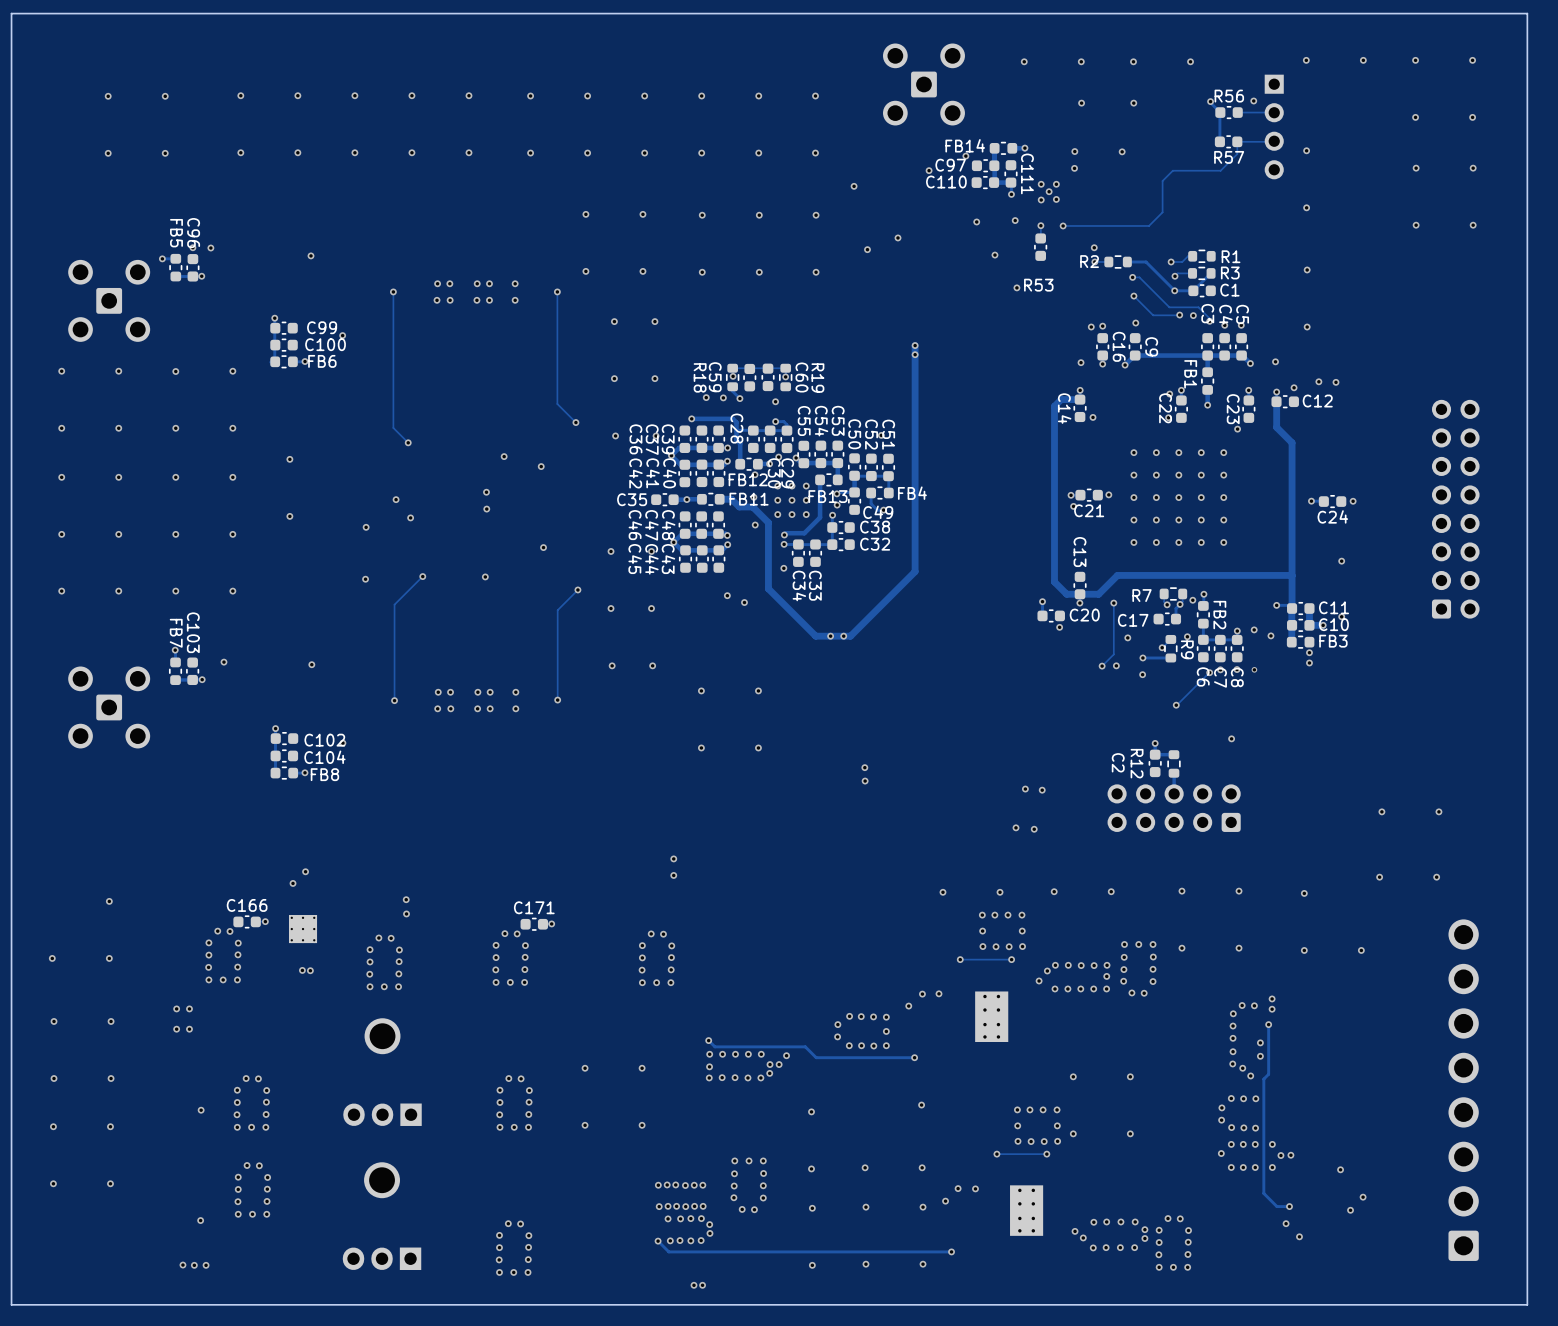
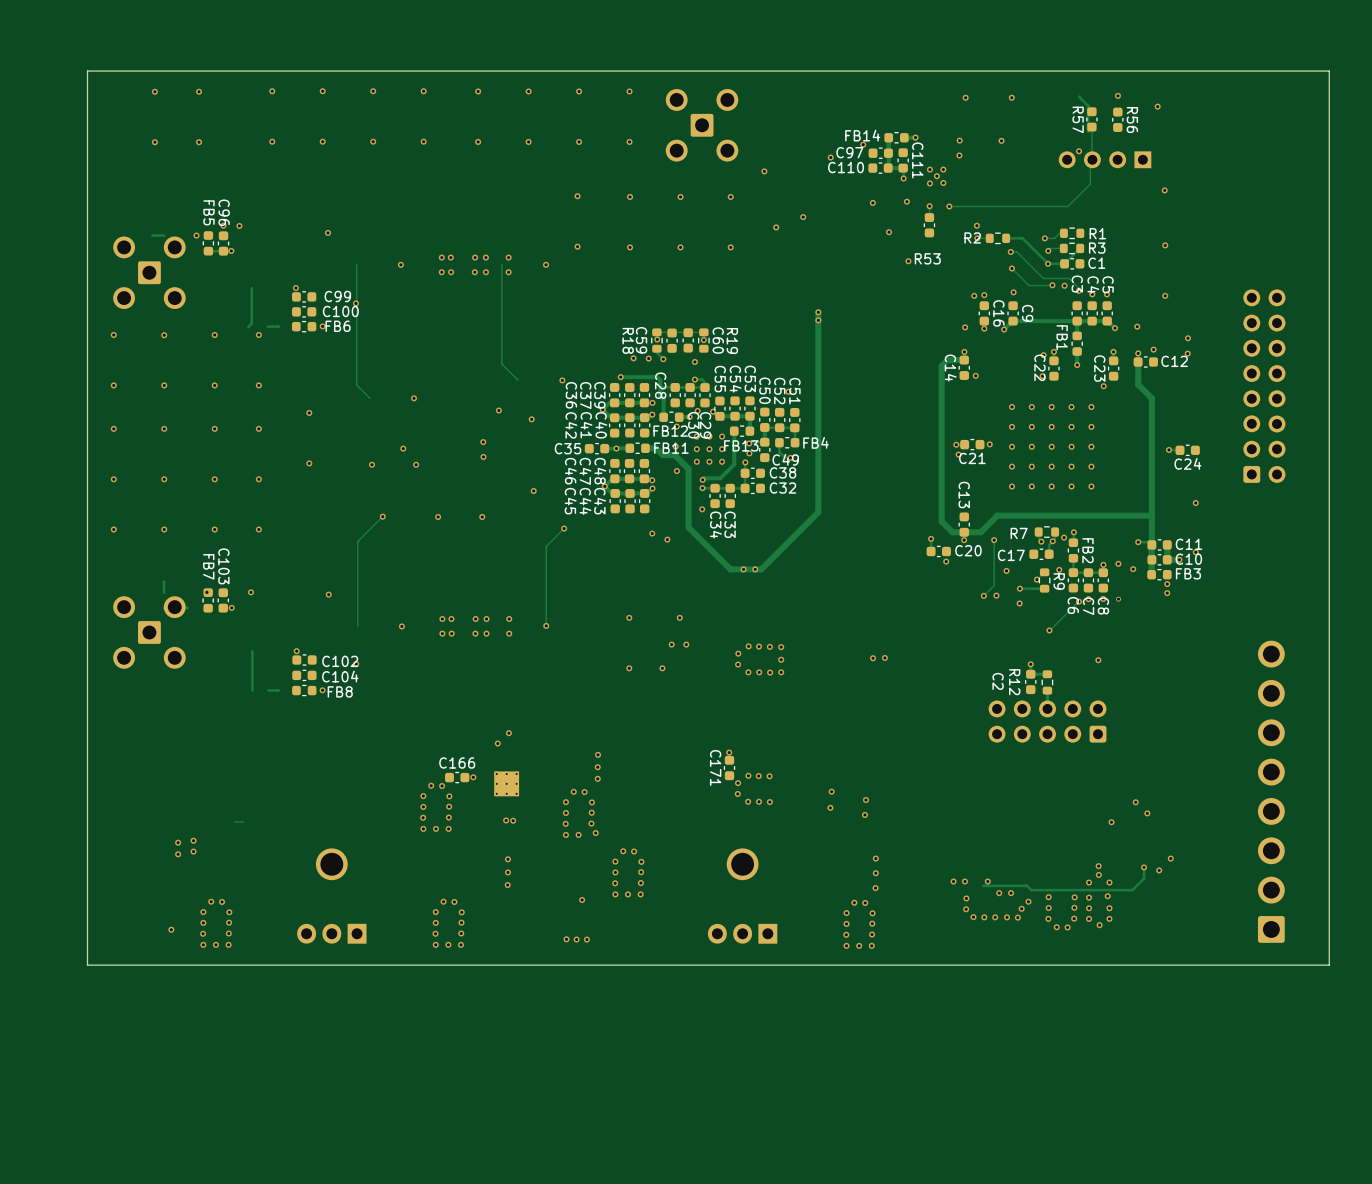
board edge: (1527, 13) (11, 13) (11, 1304) (1527, 1304) (1527, 13) -> (1329, 71) (1329, 965) (87, 965) (87, 71) (1329, 71)
via: (1306, 60) -> none
via: (1363, 60) -> none
via: (1415, 60) -> none
via: (1472, 60) -> none
via: (1024, 61) -> none
via: (1081, 61) -> none
via: (1133, 61) -> none
via: (1190, 61) -> none
part position: (923, 84) -> (702, 125)
via position: (240, 95) -> (199, 91)
via: (108, 96) -> none
via: (758, 96) -> none
via: (815, 96) -> none
via: (1210, 101) -> none
R56 rotation: 0° (1229, 112) -> 90° clockwise (1117, 119)
R56 position: (1229, 112) -> (1117, 119)
track: (1237, 112) (1274, 112) -> none
via: none -> (1157, 106)
via: (1415, 117) -> none
via: (1472, 117) -> none
part rotation: 0° (1274, 126) -> 90° clockwise (1105, 159)
R57 rotation: 0° (1228, 141) -> 90° clockwise (1091, 119)
track: (1274, 141) (1237, 141) (1237, 154) (1220, 170) (1172, 170) (1162, 180) (1162, 212) (1148, 225) -> (1091, 127) (1090, 184) (1067, 206) (1025, 206)
via: (1306, 150) -> none
via position: (240, 152) -> (199, 142)
via: (108, 153) -> none
via: (758, 153) -> none
via: (815, 153) -> none
via: none -> (1079, 151)
via: (1416, 168) -> none
via: (1473, 168) -> none
via: (585, 214) -> none
via: (1416, 225) -> none
via: (1473, 225) -> none
via: (192, 247) -> none
via: none -> (223, 225)
via: (210, 248) -> none
via: none -> (239, 225)
via: (310, 255) -> none
via: none -> (327, 232)
via: (162, 258) -> none
via: none -> (196, 235)
FB5 position: (175, 267) -> (208, 243)
C96 position: (192, 267) -> (223, 243)
via: (585, 271) -> none
via: (201, 276) -> none
via: none -> (231, 250)
via: (437, 283) -> none
via: (449, 283) -> none
via: (477, 283) -> none
via: none -> (450, 257)
via: (515, 283) -> none
via: none -> (475, 257)
via: none -> (485, 257)
via: none -> (508, 257)
via: (393, 291) -> none
via: none -> (400, 264)
via: (557, 291) -> none
via: none -> (545, 264)
part position: (109, 300) -> (149, 272)
via: (437, 300) -> none
via: (450, 300) -> none
via: (476, 300) -> none
via: none -> (451, 272)
via: (515, 300) -> none
via: none -> (474, 272)
via: none -> (485, 272)
via: none -> (508, 272)
via: (274, 318) -> none
via: none -> (295, 288)
via: (614, 321) -> none
via: (654, 321) -> none
C99 position: (284, 328) -> (304, 296)
via: (342, 335) -> none
via: none -> (356, 303)
C100 position: (284, 345) -> (304, 311)
FB6 position: (284, 361) -> (304, 326)
via: (305, 361) -> none
via: none -> (322, 326)
via: (61, 371) -> none
via: none -> (258, 334)
via: none -> (1187, 338)
via: (614, 378) -> none
via: (654, 378) -> none
via: (1318, 381) -> none
via: (1335, 382) -> none
via: none -> (1187, 353)
via: (575, 422) -> none
via: none -> (562, 380)
via: (61, 428) -> none
via: none -> (258, 385)
via: (615, 435) -> none
via: (656, 435) -> none
via: (408, 442) -> none
via: none -> (414, 398)
via: (504, 456) -> none
via: none -> (498, 410)
via: (289, 459) -> none
via: none -> (309, 412)
via: (541, 466) -> none
via: none -> (531, 419)
via: (61, 477) -> none
via: none -> (258, 428)
via: (486, 492) -> none
via: none -> (483, 442)
via: (396, 499) -> none
via: none -> (403, 448)
via: (1353, 501) -> none
via: (486, 509) -> none
via: none -> (483, 456)
part position: (1455, 509) -> (1264, 386)
via position: (289, 516) -> (258, 479)
via: none -> (309, 463)
via: none -> (416, 464)
via: (366, 527) -> none
via: (61, 534) -> none
via: (543, 547) -> none
via position: (611, 551) -> (533, 491)
via: (651, 551) -> none
via: none -> (482, 517)
via: (365, 579) -> none
track: (577, 589) (557, 610) (557, 700) -> (564, 528) (546, 546) (546, 625)
via: (577, 589) -> none
via: none -> (564, 528)
via: (61, 591) -> none
via: none -> (258, 529)
via: (611, 608) -> none
via: (651, 608) -> none
via: (175, 650) -> none
via: none -> (251, 592)
via: (311, 664) -> none
via: none -> (328, 594)
via: (612, 665) -> none
via: (652, 665) -> none
FB7 position: (175, 671) -> (208, 600)
C103 position: (192, 671) -> (223, 600)
via: (202, 679) -> none
via: none -> (231, 607)
via: (438, 692) -> none
via: (450, 692) -> none
via: (477, 692) -> none
via: none -> (451, 619)
via: (515, 692) -> none
via: none -> (475, 619)
via: none -> (486, 619)
via: none -> (509, 619)
via: (394, 700) -> none
via: none -> (401, 626)
via: (557, 700) -> none
via: none -> (546, 625)
part position: (109, 707) -> (149, 632)
via: (437, 708) -> none
via: (450, 708) -> none
via: (477, 708) -> none
via: none -> (451, 633)
via: (515, 708) -> none
via: none -> (475, 633)
via: none -> (486, 633)
via: none -> (509, 633)
via: none -> (671, 644)
via: none -> (686, 644)
via: none -> (748, 646)
via: none -> (758, 646)
via: none -> (769, 646)
via: none -> (781, 647)
via: (275, 728) -> none
via: none -> (296, 651)
via: none -> (738, 653)
via: none -> (873, 658)
via: none -> (884, 657)
C102 position: (284, 738) -> (304, 659)
via: none -> (781, 659)
via: (342, 743) -> none
via: none -> (356, 664)
via: none -> (738, 664)
via: none -> (662, 668)
via: (758, 747) -> none
via: none -> (748, 672)
via: none -> (759, 672)
via: none -> (770, 672)
via: none -> (781, 672)
C104 position: (284, 755) -> (304, 675)
via: (864, 767) -> none
via: (304, 772) -> none
via: none -> (322, 690)
FB8 position: (284, 773) -> (304, 690)
via: (865, 781) -> none
via: (1025, 789) -> none
via: (1042, 790) -> none
via: (1381, 811) -> none
via: (1438, 811) -> none
via: none -> (508, 733)
via: (1015, 827) -> none
via: (1034, 829) -> none
via: none -> (497, 743)
via: none -> (729, 752)
via: none -> (598, 754)
via: (673, 858) -> none
via: none -> (597, 767)
via: none -> (748, 775)
via: none -> (758, 776)
via: none -> (769, 776)
via: (305, 871) -> none
via: none -> (473, 777)
via: none -> (597, 778)
via: (673, 875) -> none
via: none -> (738, 783)
via: (1379, 877) -> none
via: (1436, 877) -> none
via: none -> (431, 785)
via: none -> (442, 786)
via: (293, 883) -> none
via: none -> (573, 791)
via: none -> (584, 792)
via: none -> (831, 791)
via: none -> (737, 793)
via: (1054, 891) -> none
via: (1111, 891) -> none
via: (1181, 891) -> none
via: (1239, 891) -> none
via: none -> (423, 796)
via: none -> (449, 796)
via: (942, 892) -> none
via: (1000, 892) -> none
via: (1304, 893) -> none
via: none -> (865, 800)
via: none -> (748, 801)
via: none -> (758, 801)
via: (406, 899) -> none
via: none -> (565, 802)
via: none -> (591, 802)
via: none -> (769, 802)
via: none -> (1135, 802)
via: (109, 901) -> none
via: none -> (423, 806)
via: none -> (449, 806)
via: none -> (830, 807)
C171 name position: C171 (534, 907) -> C171 (715, 767)
via: none -> (565, 813)
via: none -> (591, 812)
via: none -> (1147, 813)
via: (406, 913) -> none
via: none -> (864, 814)
via: (982, 915) -> none
via: (994, 915) -> none
via: (1008, 915) -> none
via: (1021, 915) -> none
via: none -> (423, 817)
via: none -> (448, 817)
via: none -> (506, 820)
via: none -> (513, 820)
C166 position: (247, 921) -> (457, 777)
via: (265, 921) -> none
via: none -> (1111, 822)
via: (551, 923) -> none
via: none -> (565, 823)
via: none -> (591, 823)
C171 rotation: 0° (534, 924) -> 90° clockwise (729, 767)
C171 position: (534, 924) -> (729, 767)
part position: (303, 929) -> (506, 783)
via: none -> (423, 828)
via: none -> (436, 828)
via: none -> (448, 828)
via: (217, 931) -> none
via: (230, 931) -> none
via: (982, 931) -> none
via: (1022, 931) -> none
via: (504, 933) -> none
via: (517, 933) -> none
via: (651, 933) -> none
via: none -> (565, 834)
via: none -> (578, 834)
via: (378, 938) -> none
via: (391, 938) -> none
via: (238, 943) -> none
via: (1124, 944) -> none
via: (1138, 944) -> none
via: (1153, 944) -> none
via: none -> (178, 842)
via: (496, 945) -> none
via: (525, 945) -> none
via: (642, 945) -> none
via: (671, 945) -> none
via: (982, 946) -> none
via: (996, 946) -> none
via: (1009, 946) -> none
via: (1022, 946) -> none
via: (1181, 948) -> none
via: (1239, 948) -> none
via: (370, 949) -> none
via: (399, 949) -> none
via: (1304, 950) -> none
via: (1361, 950) -> none
via: (237, 954) -> none
via: none -> (623, 851)
via: none -> (634, 851)
via: (496, 957) -> none
via: (525, 957) -> none
via: (642, 957) -> none
via: (671, 957) -> none
via: (1124, 957) -> none
via: (1153, 957) -> none
via: (52, 958) -> none
via: (109, 958) -> none
via: none -> (178, 854)
via: (960, 959) -> none
track: (1011, 959) (960, 959) -> none
via: (1011, 959) -> none
via: (370, 961) -> none
via: (399, 961) -> none
via: none -> (507, 859)
via: none -> (875, 858)
via: none -> (1170, 858)
via: (1055, 965) -> none
via: (1068, 965) -> none
via: (1081, 965) -> none
via: (1094, 965) -> none
via: (1107, 965) -> none
via: none -> (615, 861)
via: none -> (641, 861)
via: (208, 967) -> none
via: (237, 967) -> none
via: (495, 969) -> none
via: (524, 969) -> none
via: (671, 969) -> none
part: none -> (742, 864)
via: (1123, 969) -> none
via: (1153, 969) -> none
via: (302, 970) -> none
via: (310, 970) -> none
via: (642, 970) -> none
via: (1047, 971) -> none
via: none -> (1098, 866)
via: (398, 973) -> none
track: none -> (1144, 867) (1144, 878) (1132, 890) (1031, 890) (1026, 885) (983, 885)
via: none -> (1144, 867)
via: (369, 974) -> none
via: (1106, 976) -> none
via: none -> (1159, 870)
via: none -> (507, 872)
via: none -> (615, 872)
via: none -> (641, 872)
via: (208, 979) -> none
via: (223, 979) -> none
via: (237, 979) -> none
via: none -> (875, 873)
via: (1039, 980) -> none
via: (1123, 981) -> none
via: (1153, 981) -> none
via: none -> (1098, 874)
via: (496, 982) -> none
via: (510, 982) -> none
via: (524, 982) -> none
via: (642, 982) -> none
via: (656, 982) -> none
via: (670, 982) -> none
via: (370, 986) -> none
via: (384, 986) -> none
via: (398, 986) -> none
via: (1054, 988) -> none
via: (1093, 988) -> none
via: none -> (615, 883)
via: none -> (640, 883)
via: none -> (1089, 882)
via: none -> (1109, 882)
via: none -> (507, 885)
via: (1131, 992) -> none
via: (938, 993) -> none
via: (1144, 993) -> none
via: (922, 994) -> none
via: none -> (875, 888)
via: (1272, 998) -> none
via: none -> (999, 893)
via: none -> (1011, 893)
via: none -> (615, 894)
via: none -> (628, 894)
via: none -> (640, 894)
via: (1254, 1005) -> none
via: (908, 1006) -> none
via: none -> (1048, 897)
via: none -> (1074, 897)
via: none -> (1089, 897)
via: (176, 1008) -> none
via: (189, 1008) -> none
via: none -> (966, 898)
via: none -> (582, 899)
via: (1272, 1009) -> none
via: none -> (211, 901)
via: none -> (443, 901)
via: none -> (1028, 901)
via: none -> (222, 901)
via: none -> (454, 901)
via: none -> (854, 902)
via: none -> (865, 902)
via: (1233, 1013) -> none
via: (849, 1016) -> none
via: (861, 1016) -> none
via: (873, 1016) -> none
part: (991, 1016) -> none
via: (886, 1017) -> none
via: none -> (1048, 908)
via: none -> (1074, 907)
via: none -> (1021, 908)
via: none -> (1089, 908)
via: none -> (1109, 908)
via: none -> (966, 909)
via: (54, 1021) -> none
via: (111, 1021) -> none
via: none -> (203, 912)
via: none -> (229, 912)
via: none -> (435, 912)
via: none -> (461, 912)
via: (837, 1024) -> none
via: none -> (846, 913)
via: none -> (872, 913)
track: (1268, 1024) (1268, 1074) (1263, 1079) (1263, 1193) (1276, 1206) (1289, 1206) -> none
via: (1268, 1024) -> none
via: (1233, 1026) -> none
via: (176, 1029) -> none
via: (189, 1029) -> none
via: none -> (973, 917)
via: none -> (984, 917)
via: none -> (995, 917)
via: none -> (1007, 917)
via: none -> (1017, 917)
via: none -> (1074, 918)
via: (886, 1031) -> none
via: none -> (1048, 918)
via: none -> (1089, 918)
via: none -> (1109, 918)
via: none -> (203, 922)
via: none -> (229, 922)
via: none -> (435, 922)
via: none -> (461, 922)
part position: (382, 1036) -> (331, 864)
via: (837, 1036) -> none
via: none -> (846, 923)
via: none -> (872, 923)
track: (708, 1040) (714, 1046) (805, 1046) (816, 1057) (914, 1057) -> none
via: (708, 1040) -> none
via: none -> (1056, 927)
via: none -> (1067, 927)
via: (1260, 1042) -> none
via: none -> (171, 929)
via: (849, 1045) -> none
via: (861, 1045) -> none
via: (886, 1045) -> none
via: (873, 1046) -> none
via: none -> (228, 933)
via: none -> (461, 933)
via: none -> (203, 933)
via: none -> (435, 933)
part: none -> (742, 933)
via: none -> (872, 934)
via: none -> (846, 934)
via: (1233, 1051) -> none
via: none -> (566, 939)
via: none -> (576, 939)
via: none -> (586, 939)
via: (709, 1054) -> none
via: (722, 1054) -> none
via: (735, 1054) -> none
via: (748, 1054) -> none
via: (761, 1054) -> none
via: (786, 1055) -> none
via: (1260, 1056) -> none
via: (914, 1057) -> none
via: none -> (203, 944)
via: none -> (215, 944)
via: none -> (228, 944)
via: none -> (435, 944)
via: none -> (448, 944)
via: none -> (460, 944)
via: none -> (846, 945)
via: none -> (859, 945)
via: none -> (871, 945)
via: (1232, 1063) -> none
via: (770, 1064) -> none
via: (779, 1064) -> none
via: (709, 1066) -> none
via: (585, 1068) -> none
via: (642, 1068) -> none
via: (1242, 1068) -> none
via: (769, 1073) -> none
via: (1250, 1075) -> none
via: (1073, 1076) -> none
via: (1130, 1076) -> none
via: (709, 1077) -> none
via: (722, 1077) -> none
via: (735, 1077) -> none
via: (747, 1077) -> none
via: (760, 1077) -> none
via: (54, 1078) -> none
via: (111, 1078) -> none
via: (246, 1078) -> none
via: (258, 1078) -> none
via: (508, 1078) -> none
via: (521, 1078) -> none
via: (237, 1090) -> none
via: (266, 1090) -> none
via: (499, 1090) -> none
via: (529, 1090) -> none
part position: (1463, 1090) -> (1271, 791)
via: (1231, 1098) -> none
via: (1243, 1098) -> none
via: (1255, 1098) -> none
via: (237, 1102) -> none
via: (266, 1102) -> none
via: (499, 1102) -> none
via: (529, 1102) -> none
via: (921, 1105) -> none
via: (1221, 1107) -> none
via: (1017, 1109) -> none
via: (1029, 1109) -> none
via: (1043, 1109) -> none
via: (1057, 1109) -> none
via: (201, 1110) -> none
via: (811, 1111) -> none
via: (237, 1114) -> none
via: (266, 1114) -> none
part position: (382, 1114) -> (331, 933)
via: (499, 1114) -> none
via: (528, 1114) -> none
via: (1221, 1120) -> none
via: (585, 1125) -> none
via: (642, 1125) -> none
via: (1017, 1125) -> none
via: (1057, 1125) -> none
via: (53, 1126) -> none
via: (110, 1126) -> none
via: (237, 1127) -> none
via: (251, 1127) -> none
via: (265, 1127) -> none
via: (499, 1127) -> none
via: (514, 1127) -> none
via: (528, 1127) -> none
via: (1231, 1127) -> none
via: (1243, 1127) -> none
via: (1255, 1128) -> none
via: (1073, 1133) -> none
via: (1130, 1133) -> none
via: (1017, 1141) -> none
via: (1031, 1141) -> none
via: (1044, 1141) -> none
via: (1057, 1141) -> none
via: (1231, 1144) -> none
via: (1243, 1144) -> none
via: (1255, 1144) -> none
via: (1272, 1144) -> none
via: (1221, 1153) -> none
via: (996, 1154) -> none
track: (1046, 1154) (996, 1154) -> none
via: (1046, 1154) -> none
via: (1280, 1155) -> none
via: (1290, 1155) -> none
via: (734, 1160) -> none
via: (749, 1160) -> none
via: (763, 1160) -> none
via: (247, 1165) -> none
via: (259, 1165) -> none
via: (865, 1167) -> none
via: (922, 1167) -> none
via: (1231, 1167) -> none
via: (1243, 1167) -> none
via: (1255, 1167) -> none
via: (1272, 1167) -> none
via: (811, 1168) -> none
via: (1340, 1169) -> none
via: (734, 1173) -> none
via: (763, 1173) -> none
via: (238, 1177) -> none
via: (267, 1177) -> none
part: (382, 1180) -> none
via: (53, 1183) -> none
via: (110, 1183) -> none
via: (667, 1184) -> none
via: (675, 1184) -> none
via: (658, 1185) -> none
via: (685, 1185) -> none
via: (694, 1185) -> none
via: (702, 1185) -> none
via: (763, 1185) -> none
via: (734, 1186) -> none
via: (958, 1188) -> none
via: (975, 1188) -> none
via: (238, 1189) -> none
via: (267, 1189) -> none
via: (733, 1197) -> none
via: (1363, 1197) -> none
via: (763, 1198) -> none
via: (237, 1201) -> none
via: (267, 1201) -> none
via: (945, 1201) -> none
via: (659, 1206) -> none
via: (668, 1206) -> none
via: (676, 1206) -> none
via: (685, 1206) -> none
via: (694, 1206) -> none
via: (703, 1206) -> none
via: (1289, 1206) -> none
via: (865, 1207) -> none
via: (923, 1207) -> none
via: (812, 1208) -> none
via: (742, 1209) -> none
via: (754, 1209) -> none
part: (1026, 1210) -> none
via: (1350, 1210) -> none
via: (238, 1214) -> none
via: (252, 1214) -> none
via: (266, 1214) -> none
via: (668, 1218) -> none
via: (680, 1218) -> none
via: (690, 1218) -> none
via: (701, 1218) -> none
via: (1168, 1218) -> none
via: (1180, 1218) -> none
via: (200, 1220) -> none
via: (1106, 1221) -> none
via: (1120, 1221) -> none
via: (1135, 1221) -> none
via: (1093, 1222) -> none
via: (508, 1223) -> none
via: (520, 1223) -> none
via: (1286, 1223) -> none
via: (709, 1224) -> none
via: (1144, 1229) -> none
via: (1159, 1230) -> none
via: (1188, 1230) -> none
via: (1075, 1231) -> none
via: (709, 1233) -> none
via: (499, 1235) -> none
via: (528, 1235) -> none
via: (1299, 1236) -> none
via: (1083, 1237) -> none
via: (1144, 1238) -> none
via: (670, 1240) -> none
via: (680, 1240) -> none
via: (690, 1240) -> none
via: (701, 1240) -> none
track: (658, 1241) (668, 1251) (951, 1251) -> none
via: (658, 1241) -> none
via: (1159, 1242) -> none
via: (1188, 1242) -> none
via: (499, 1247) -> none
via: (528, 1247) -> none
via: (1093, 1247) -> none
via: (1106, 1247) -> none
via: (1120, 1247) -> none
via: (1134, 1247) -> none
via: (951, 1251) -> none
via: (1158, 1254) -> none
via: (1187, 1254) -> none
part: (382, 1258) -> none
via: (499, 1259) -> none
via: (528, 1259) -> none
via: (865, 1264) -> none
via: (923, 1264) -> none
via: (182, 1265) -> none
via: (194, 1265) -> none
via: (206, 1265) -> none
via: (812, 1265) -> none
via: (1159, 1267) -> none
via: (1173, 1267) -> none
via: (1187, 1267) -> none
via: (499, 1272) -> none
via: (513, 1272) -> none
via: (528, 1272) -> none
via: (694, 1285) -> none
via: (702, 1285) -> none

